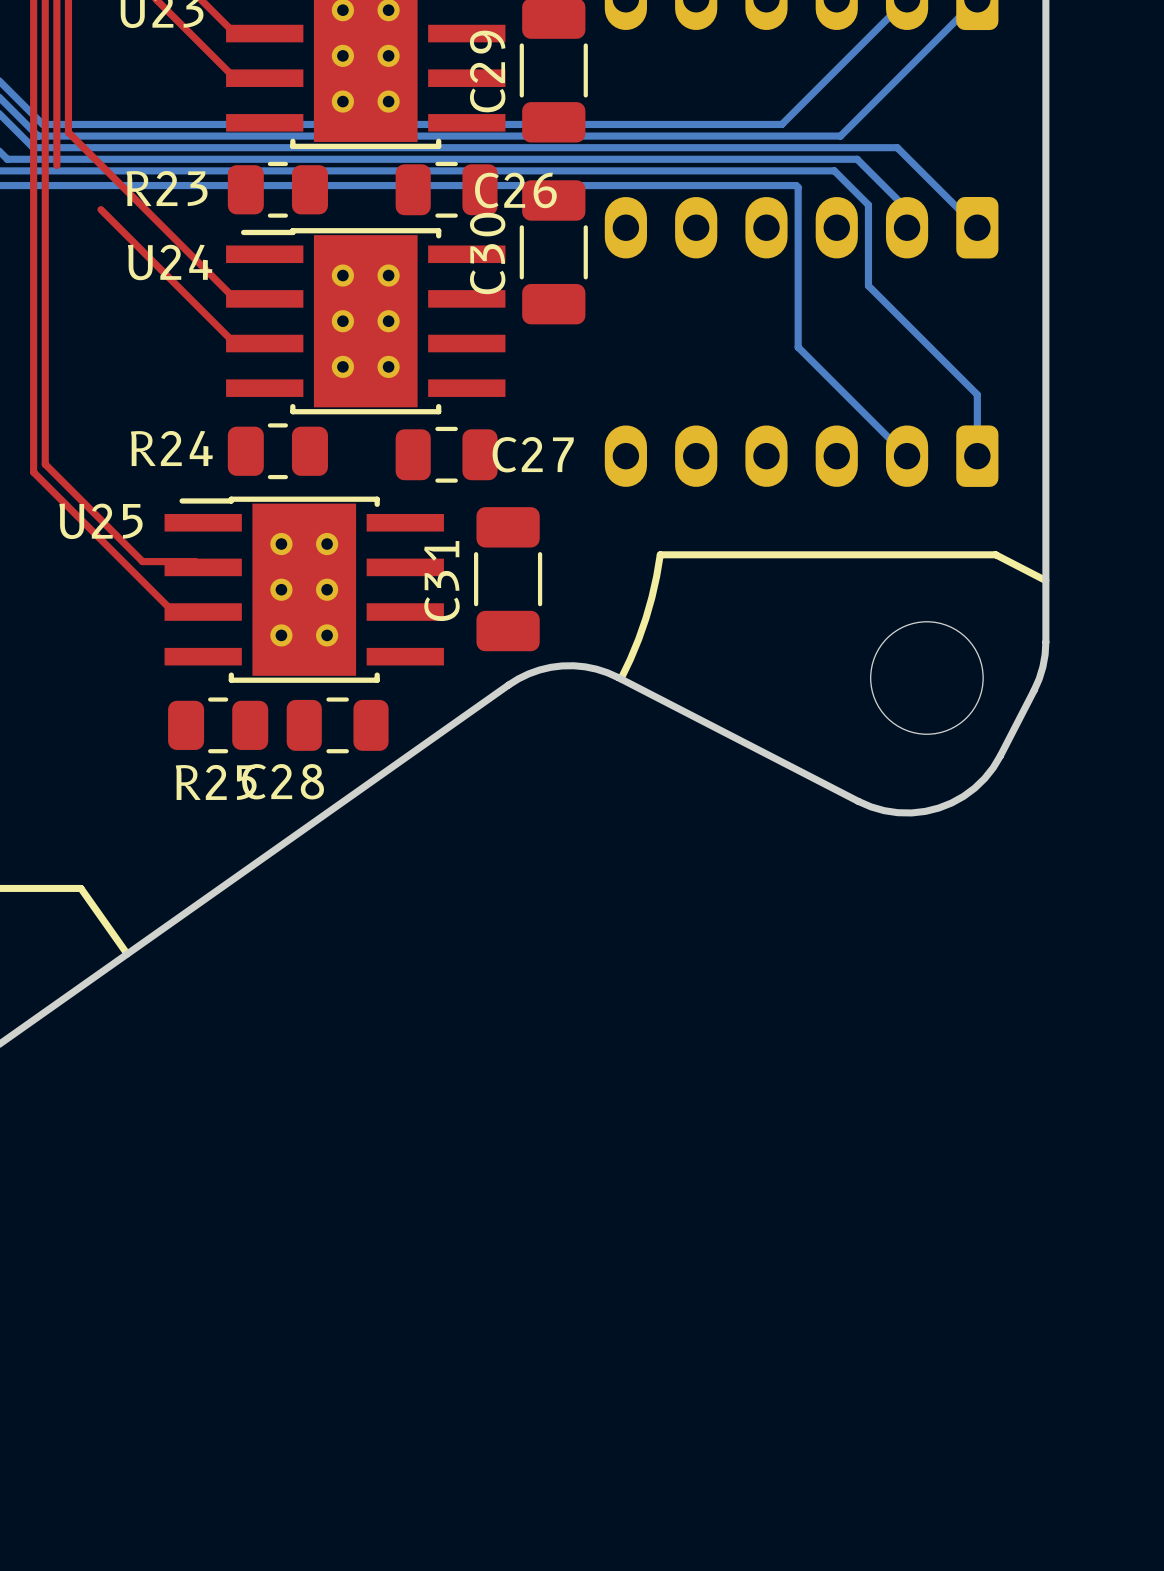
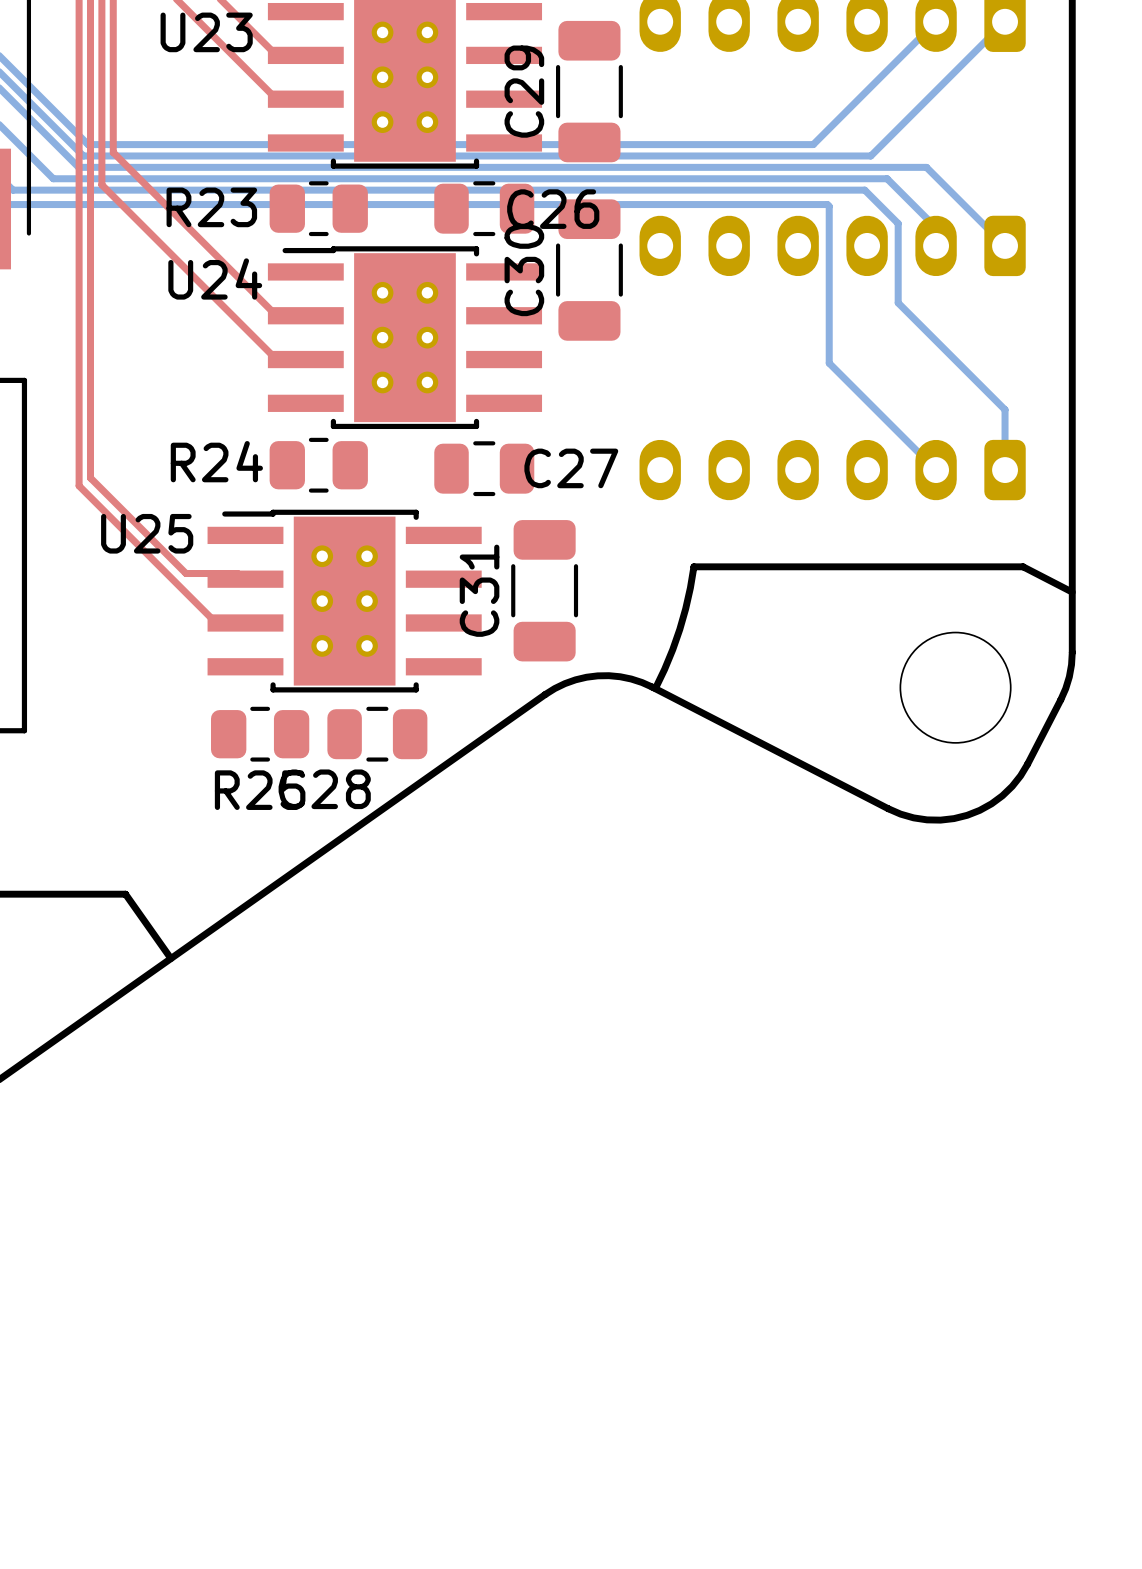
top track: none -> (101, 184) (145, 228)

